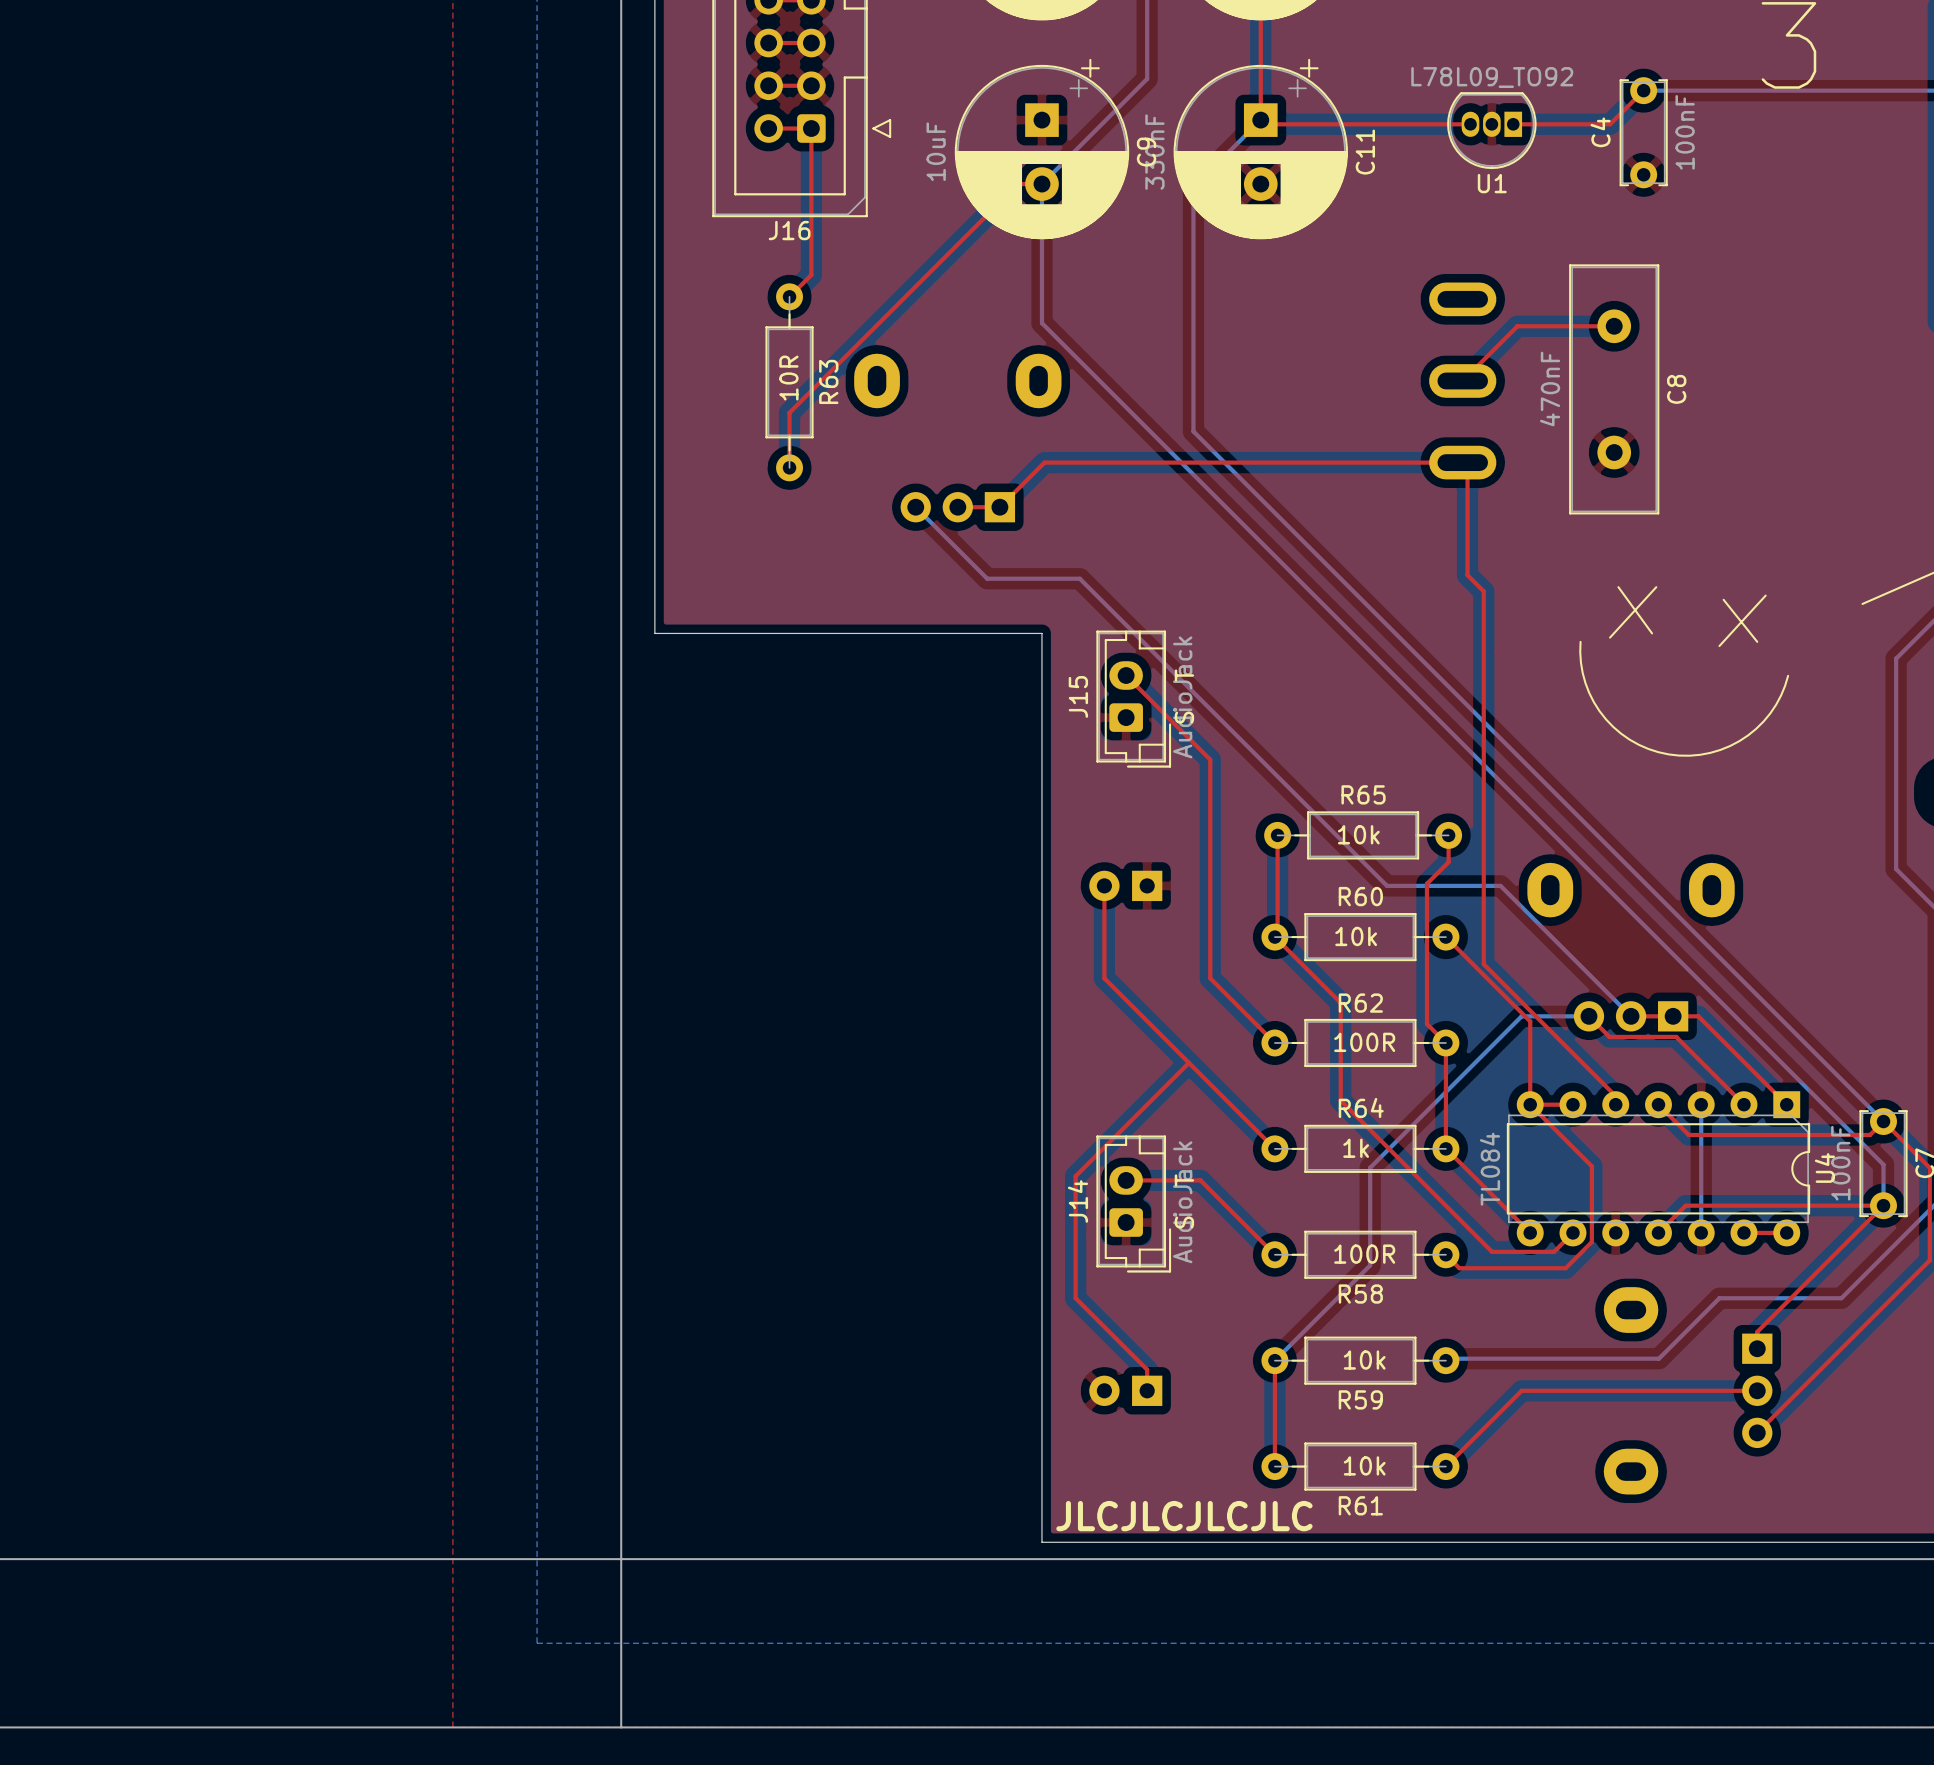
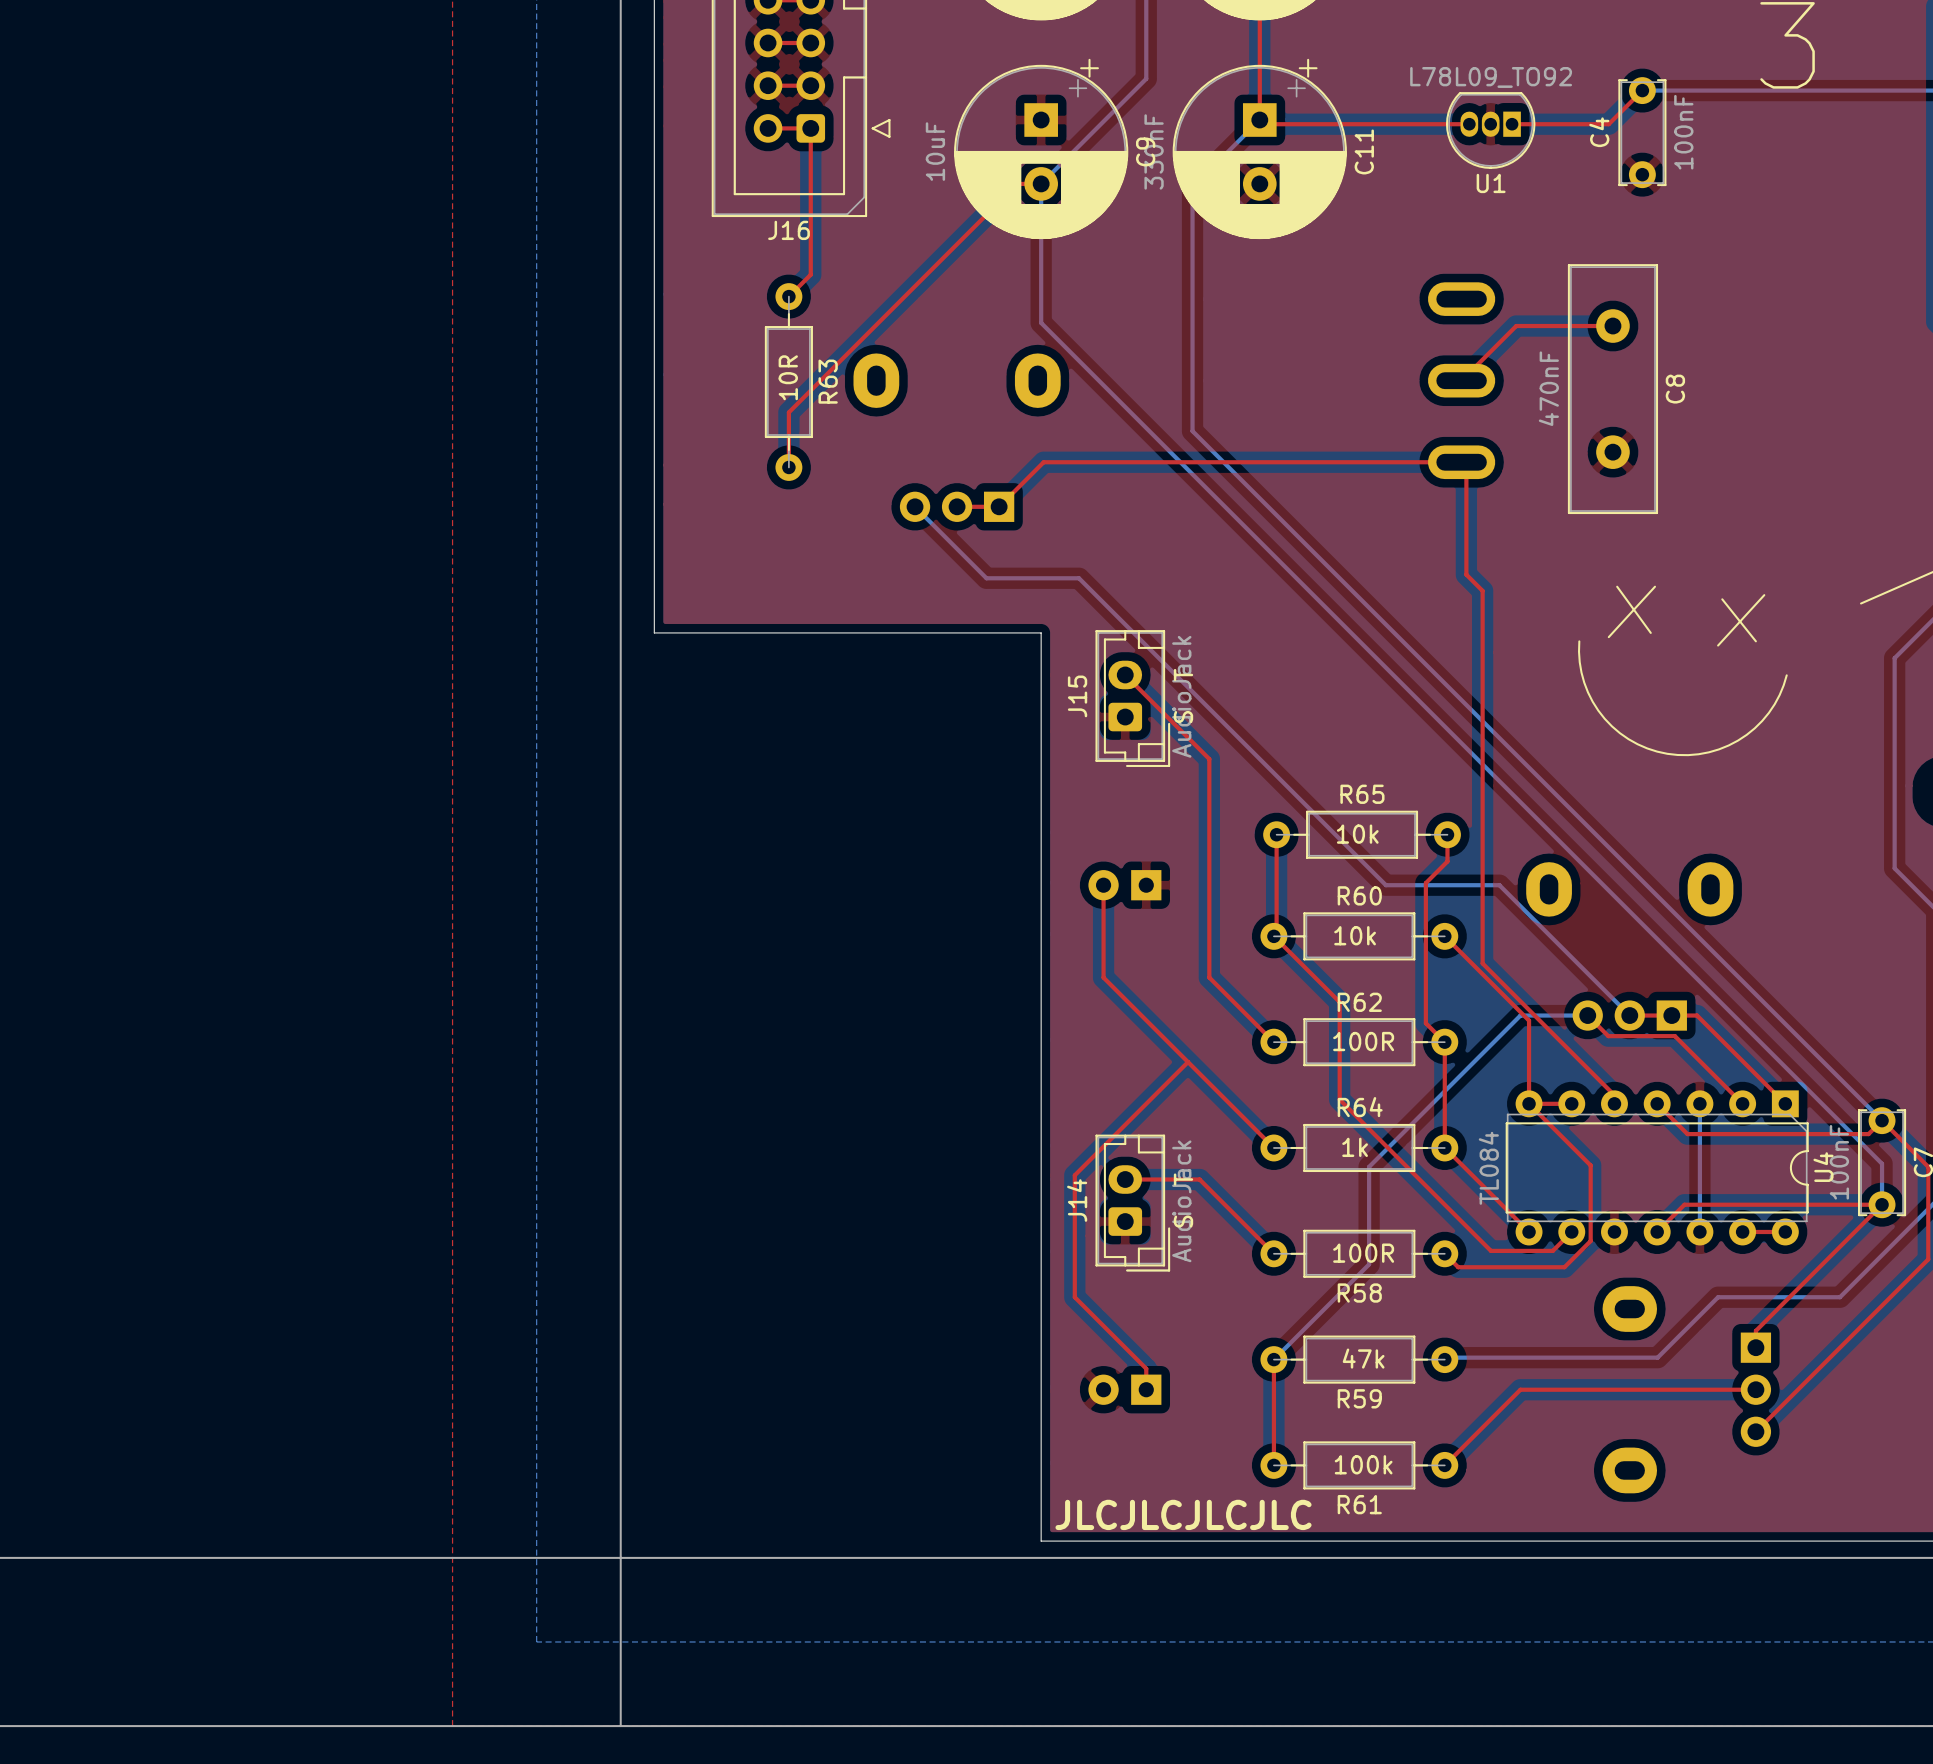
R59 value: 10k (1364, 1360) -> 47k (1363, 1358)
R61 value: 10k (1364, 1465) -> 100k (1363, 1464)

